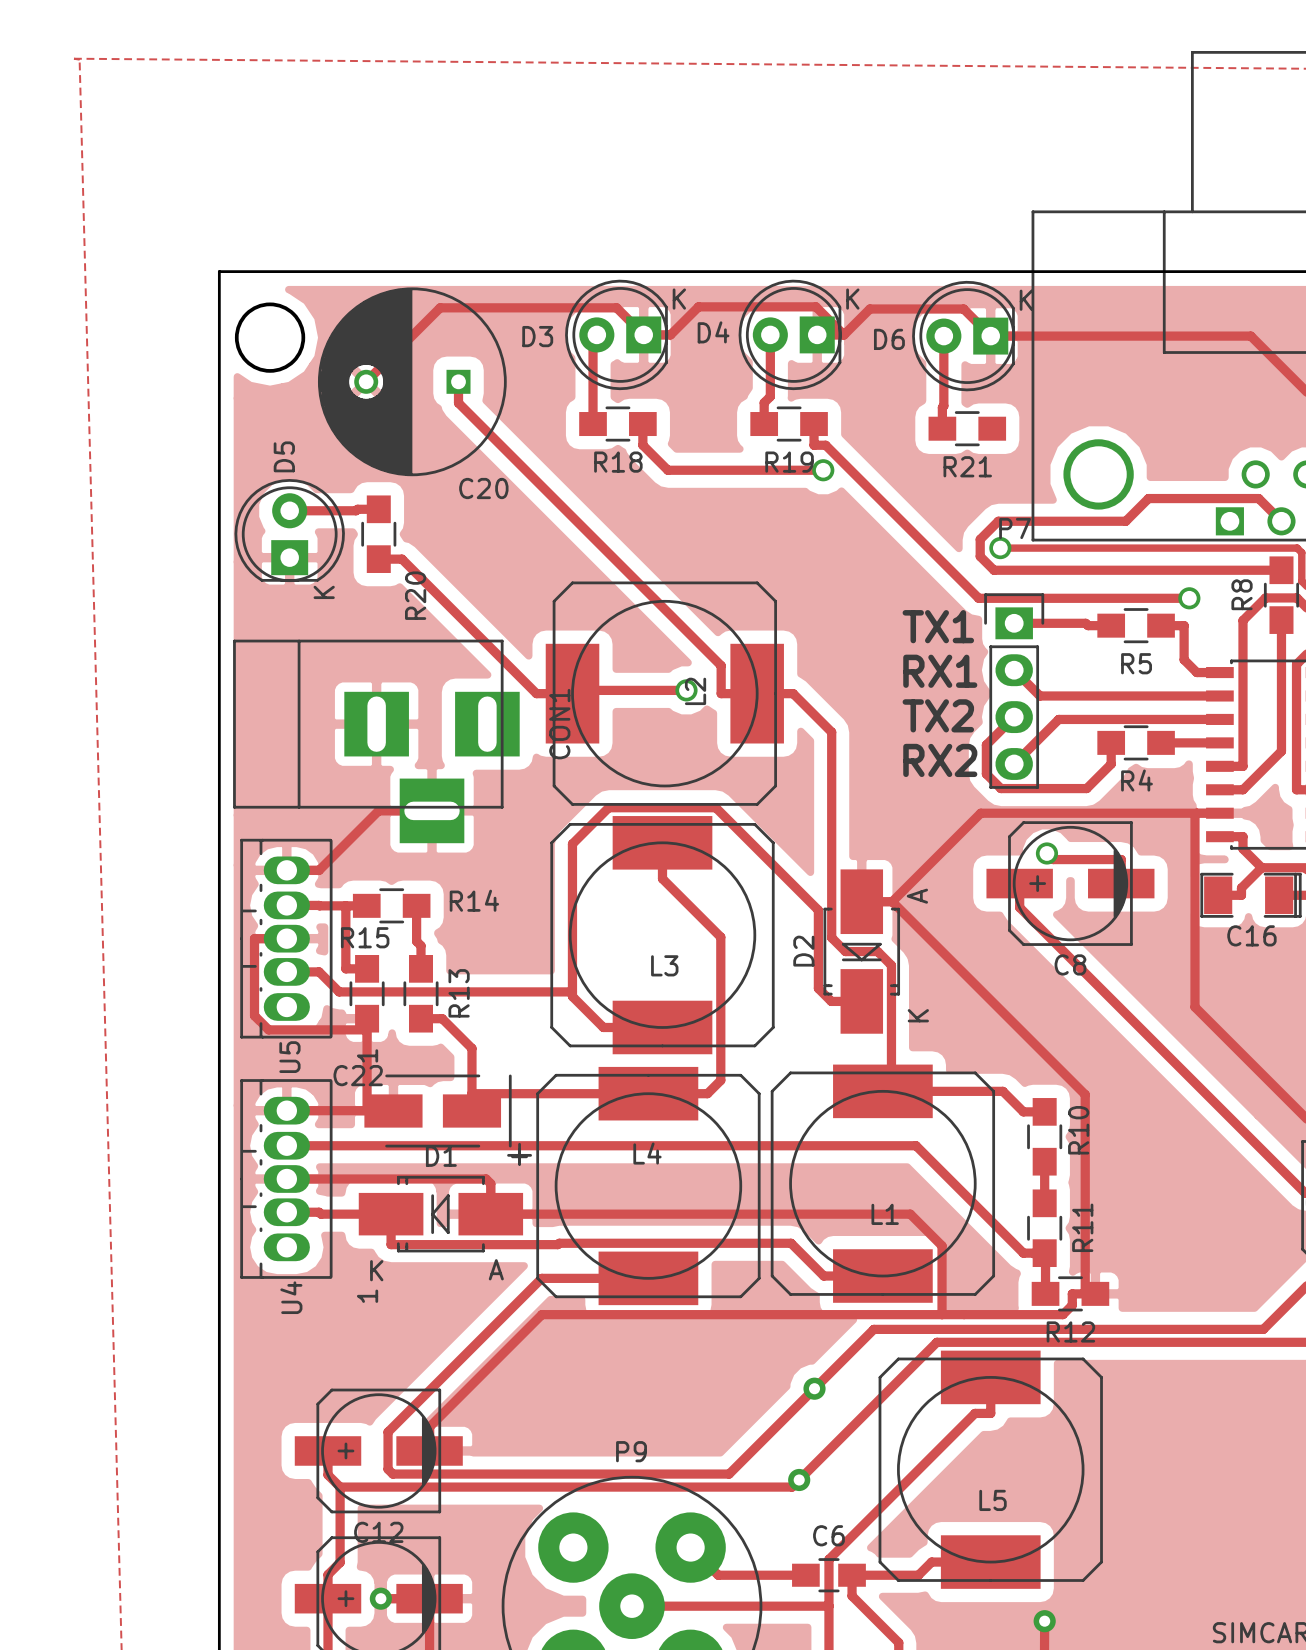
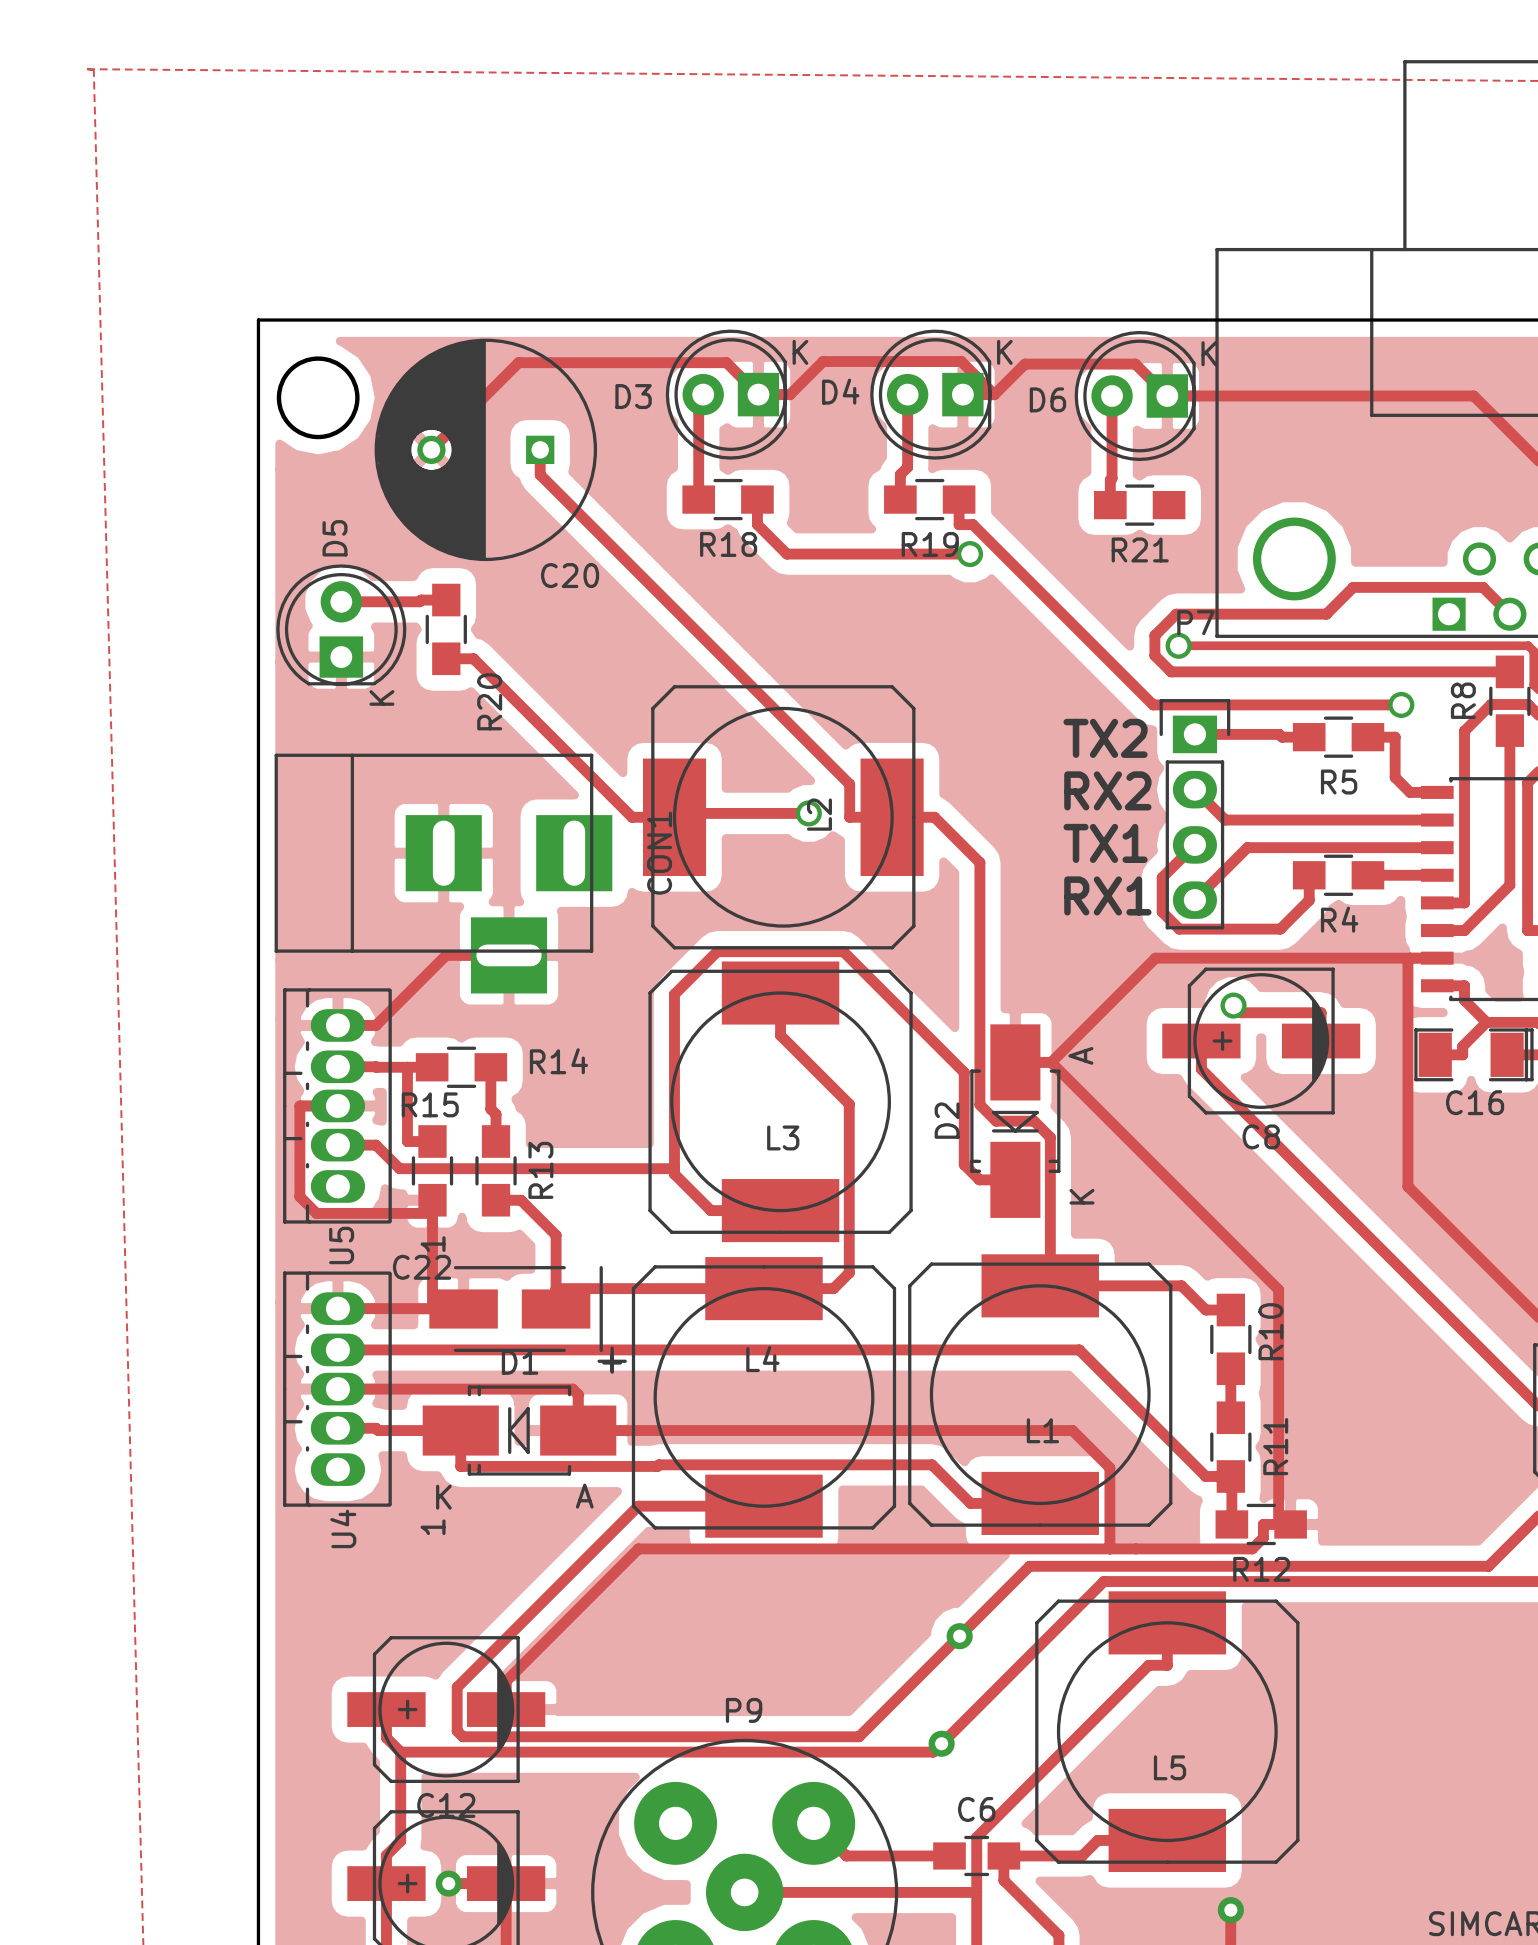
text: TX1 (938, 626) -> TX2 (1105, 738)
text: RX1 (940, 671) -> RX2 (1107, 790)
text: TX2 (938, 715) -> TX1 (1105, 843)
text: RX2 (940, 760) -> RX1 (1107, 895)

